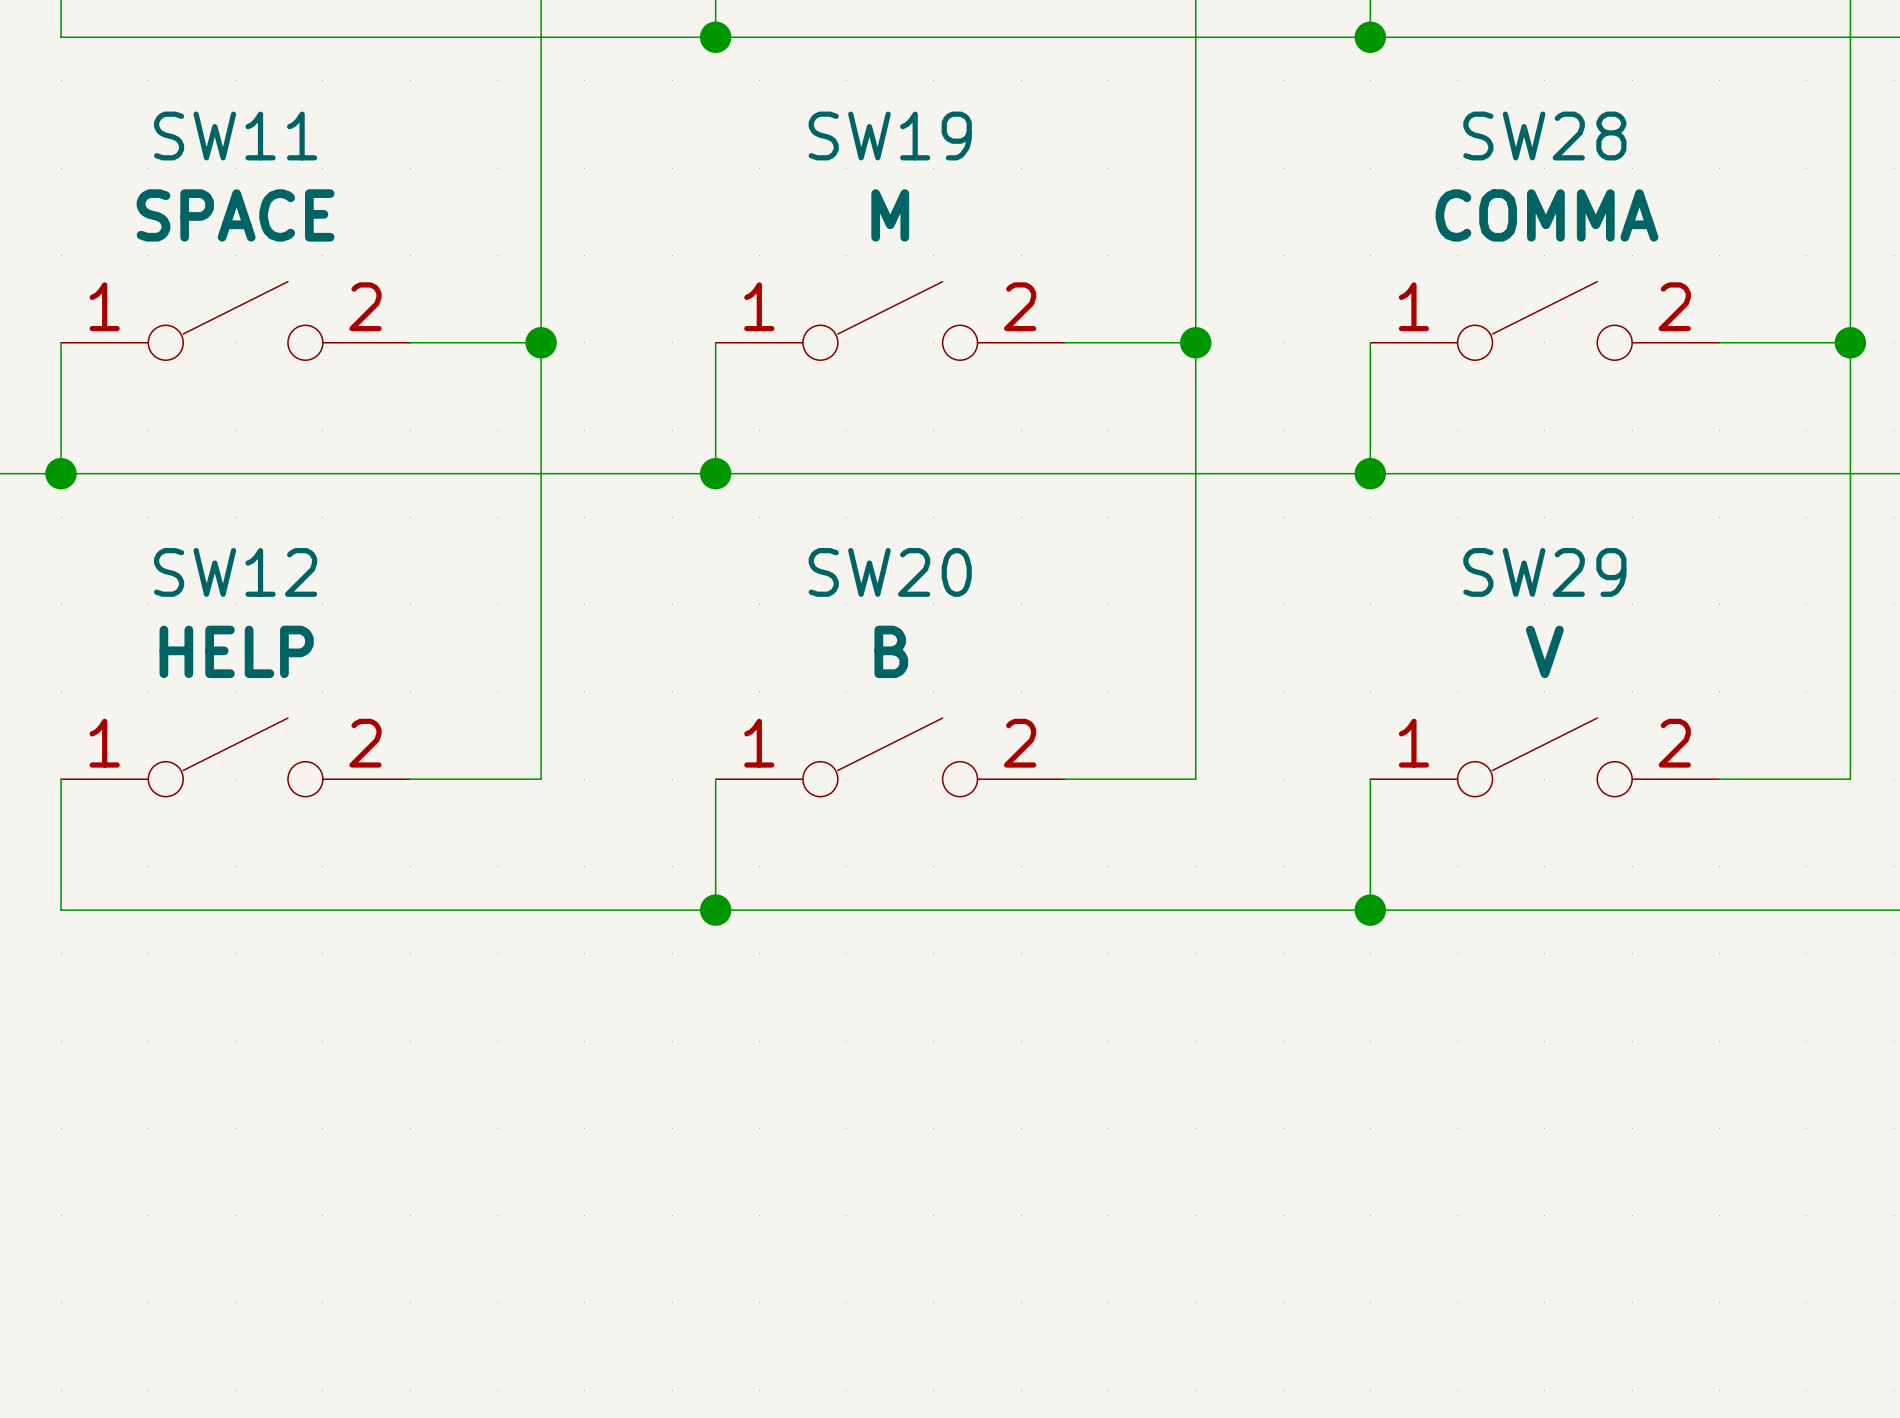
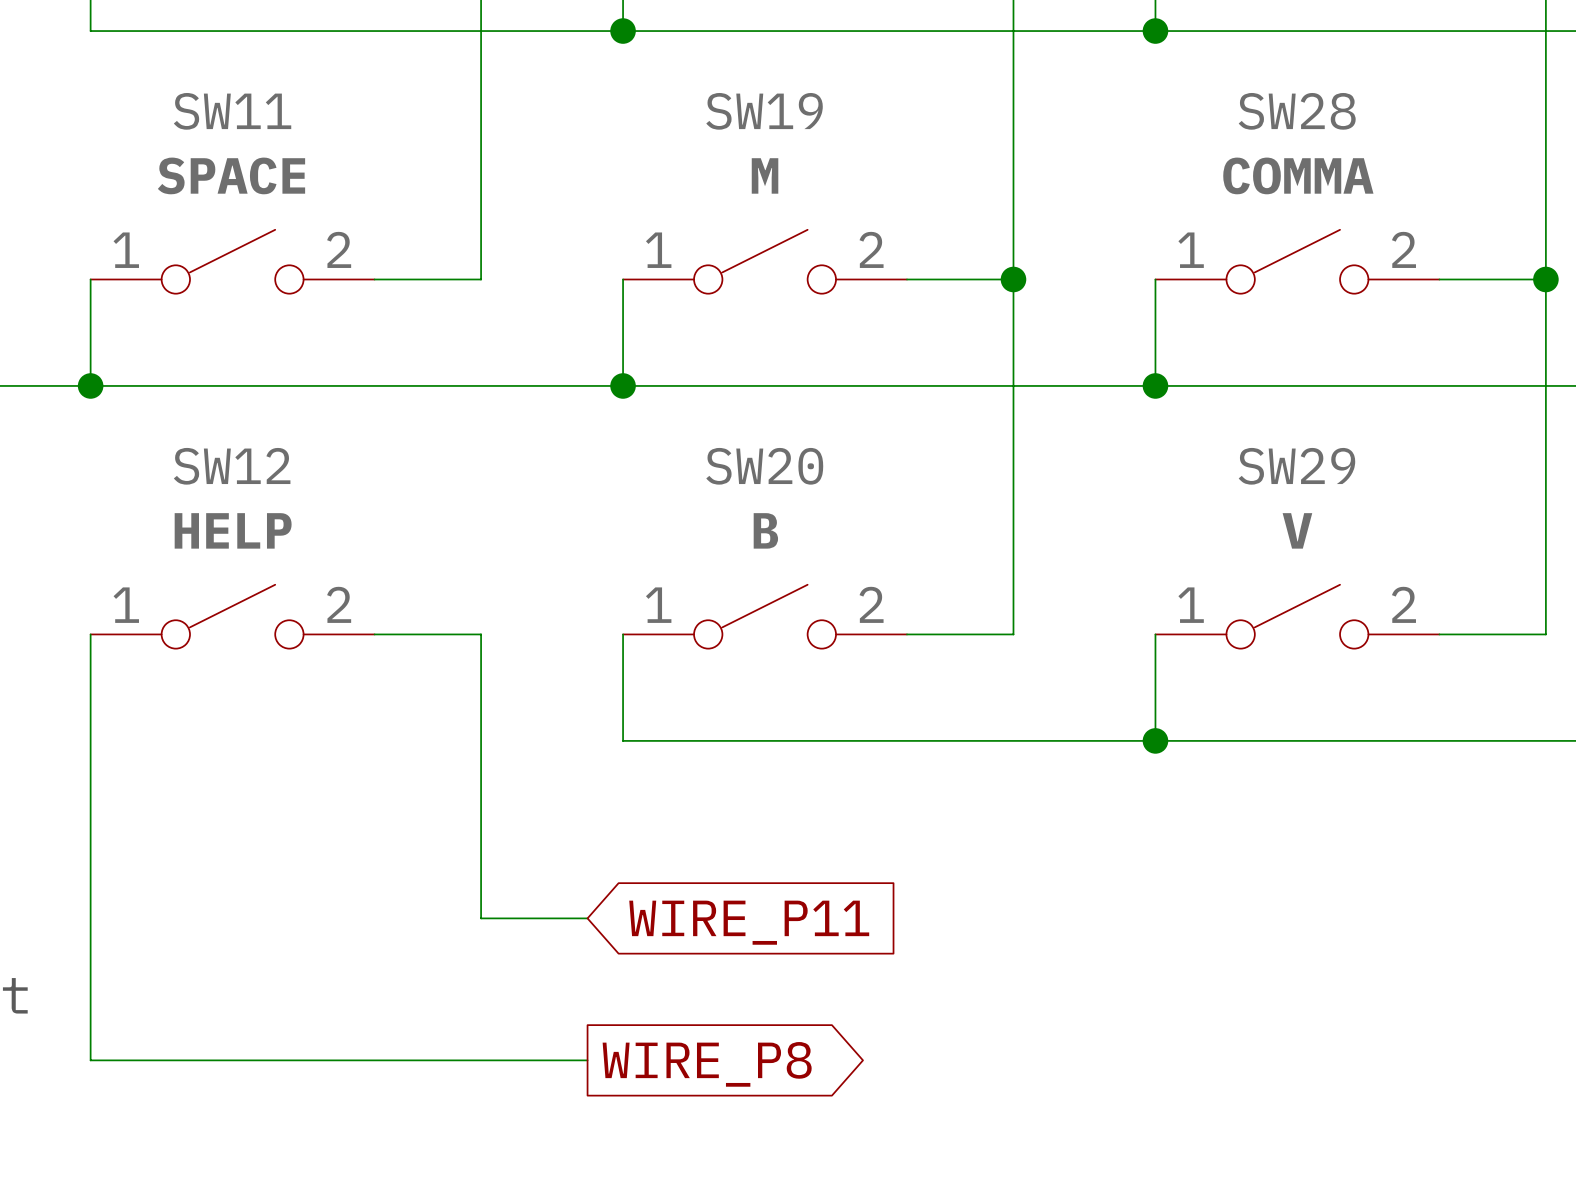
wire: (541, 342) (541, 779) -> (587, 918) (481, 918) (481, 634)
junction: (541, 342) -> none
wire: (61, 910) (715, 910) -> (90, 740) (90, 1060) (587, 1060)
junction: (715, 910) -> none
global label: none -> WIRE_P11 (749, 922)
global label: none -> WIRE_P8 (707, 1064)

